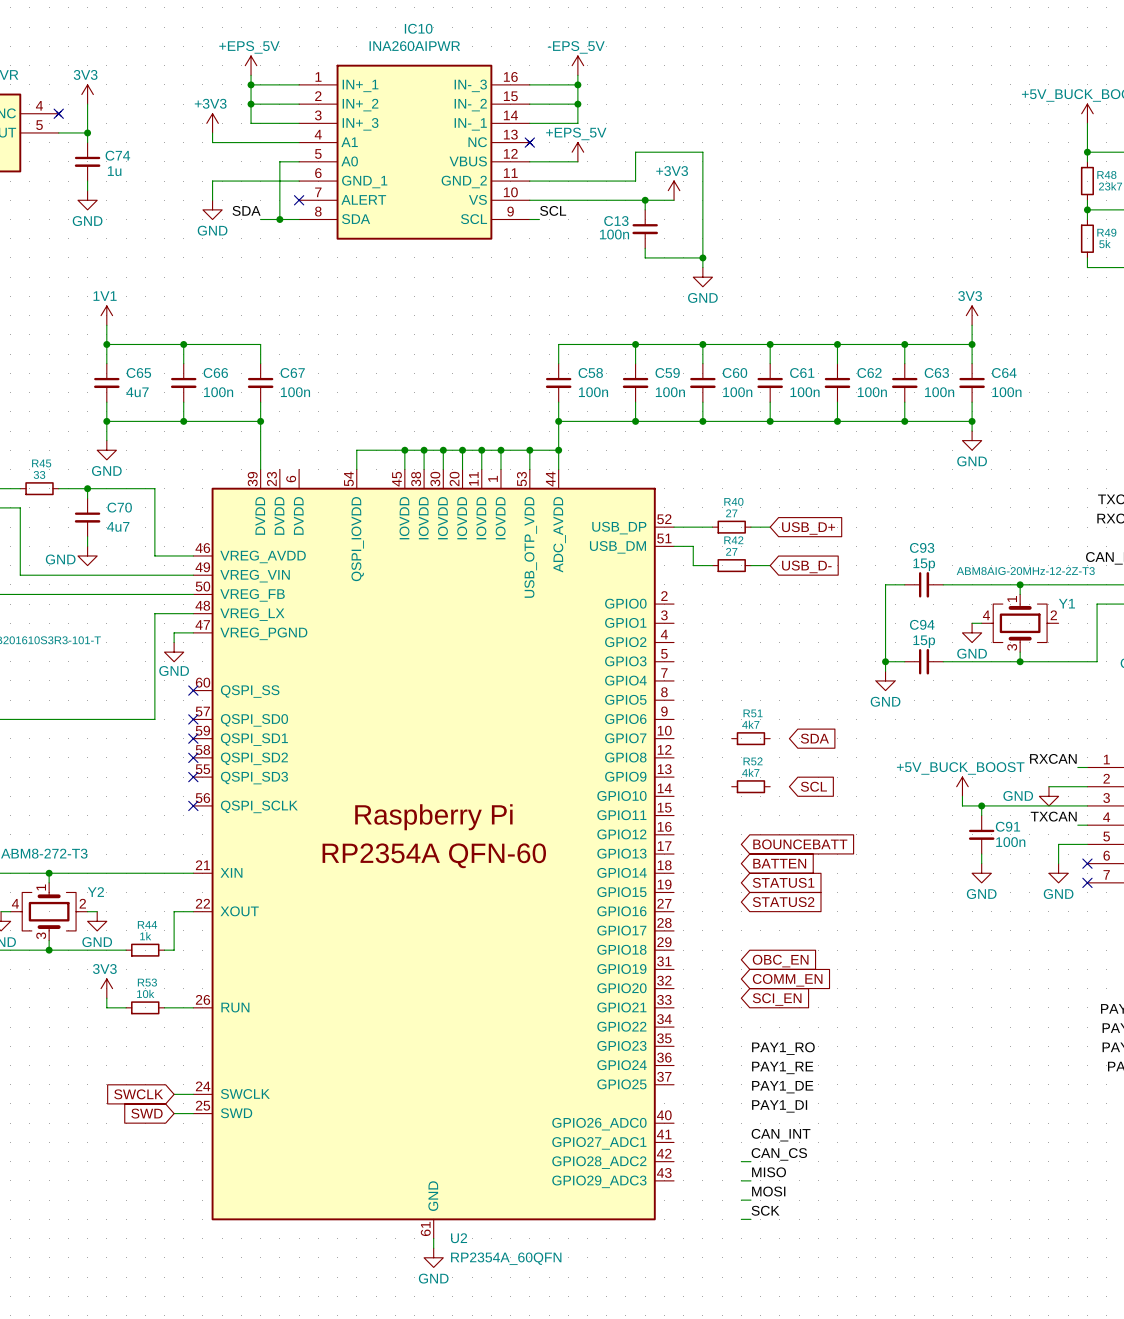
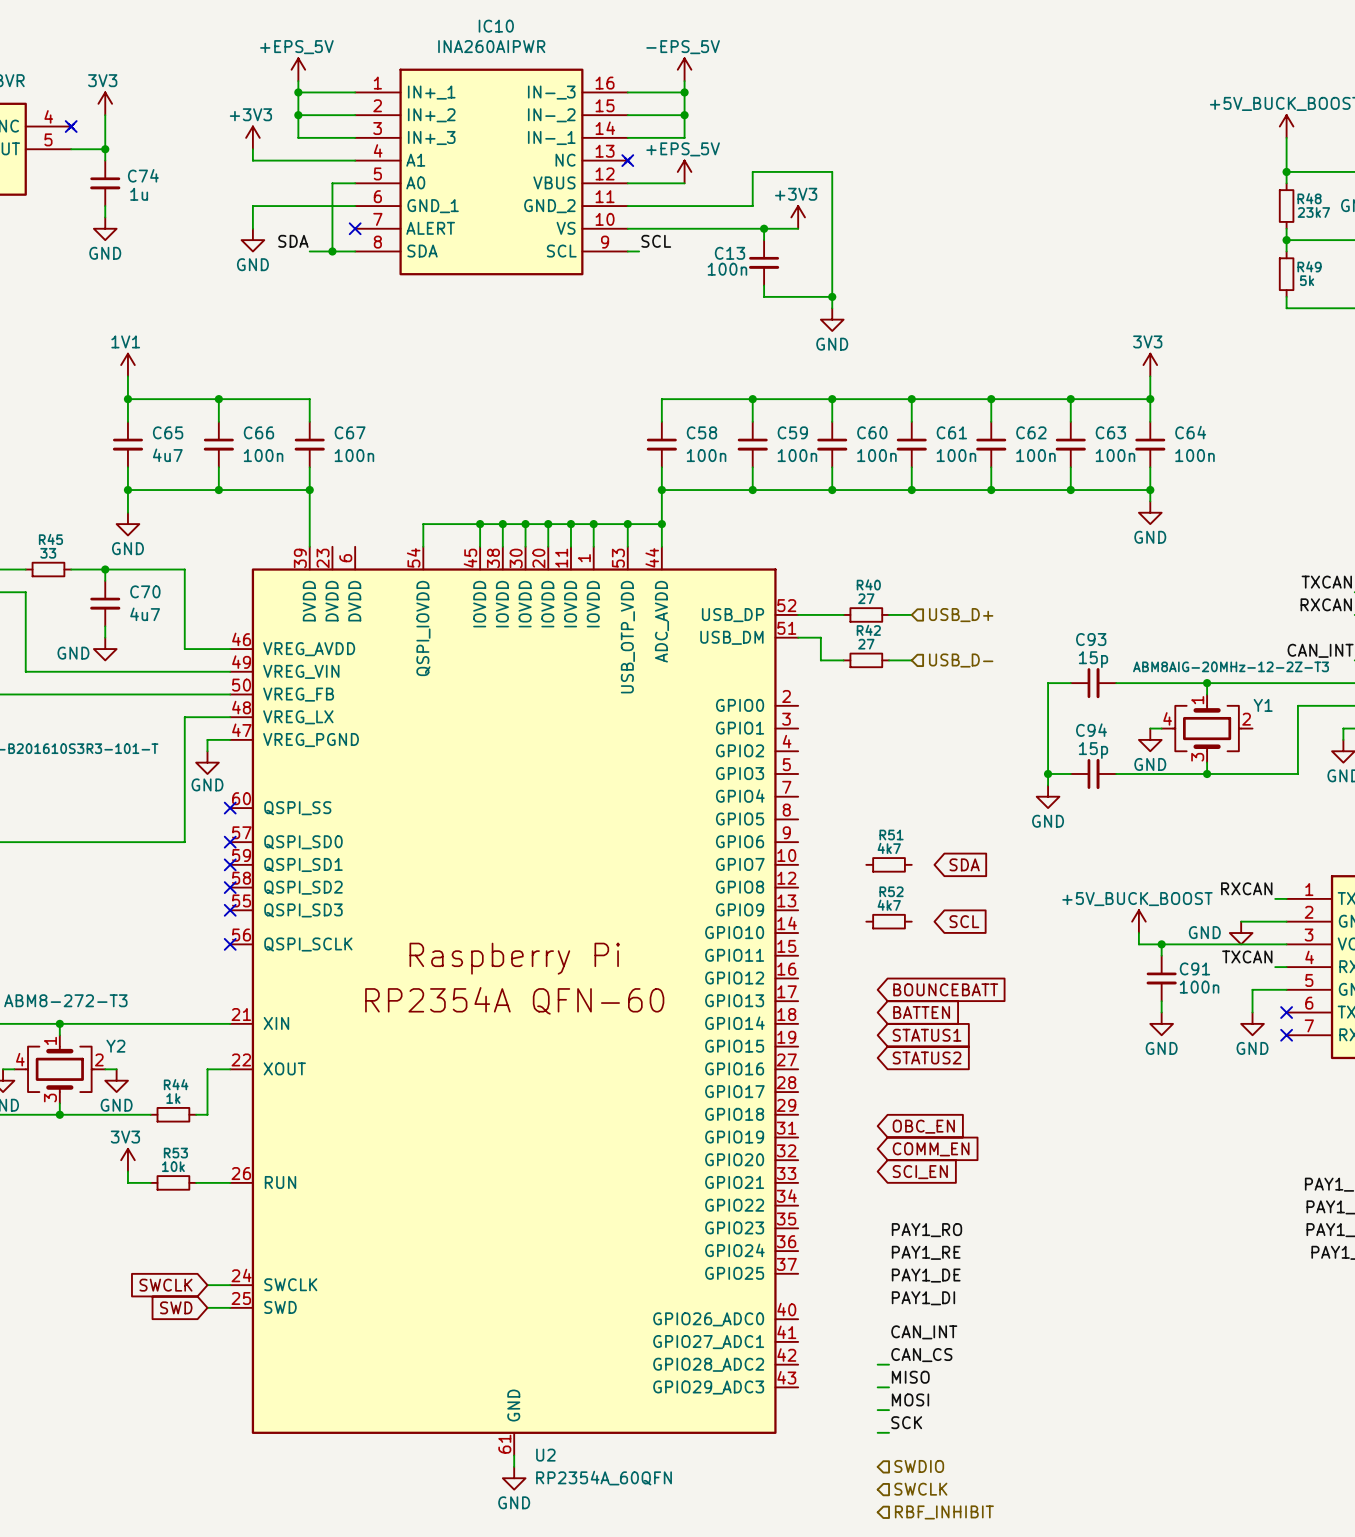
global label: USB_D+ (808, 528) -> none
hierarchical label: none -> USB_D+ (961, 615)
global label: USB_D- (806, 566) -> none
hierarchical label: none -> USB_D- (961, 660)
hierarchical label: none -> SWDIO (919, 1466)
hierarchical label: none -> SWCLK (920, 1489)
hierarchical label: none -> RBF_INHIBIT (944, 1512)

